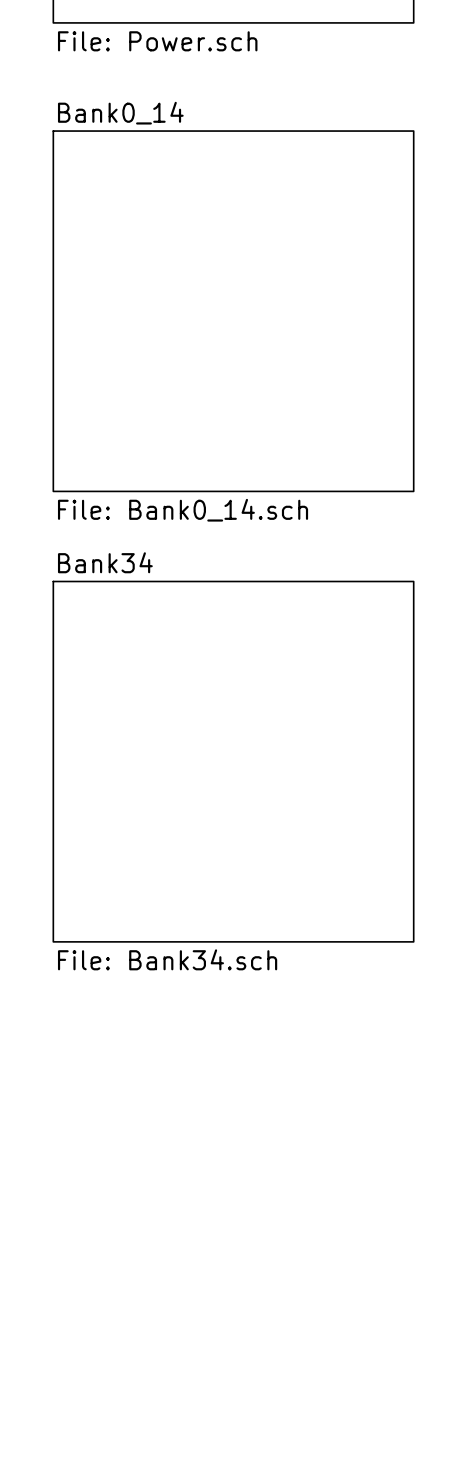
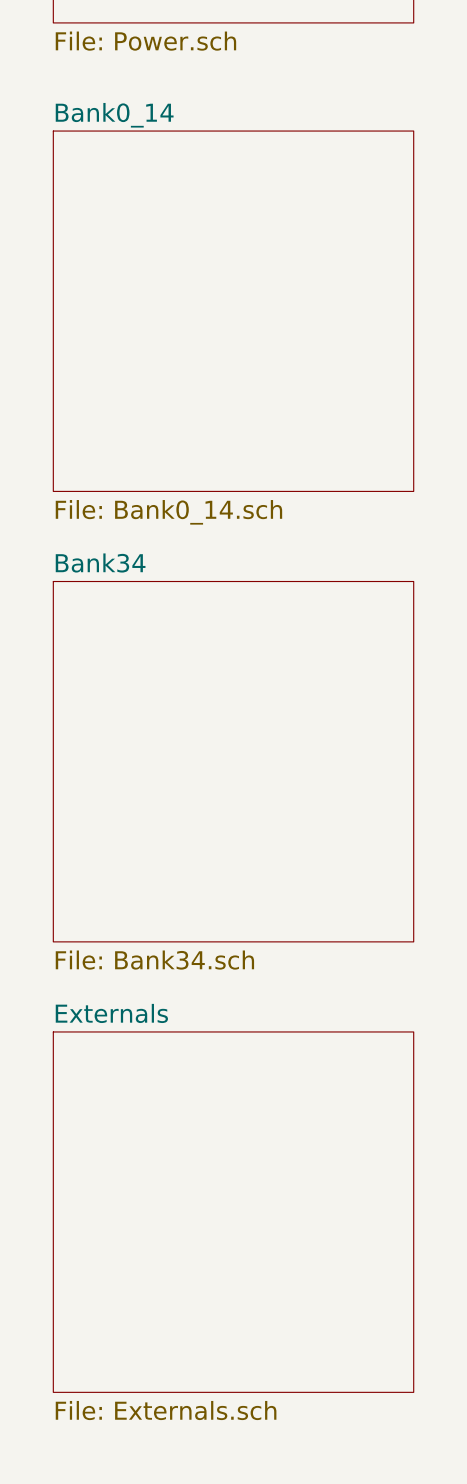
sheet Externals: none -> File: Externals.sch (233, 1212)

